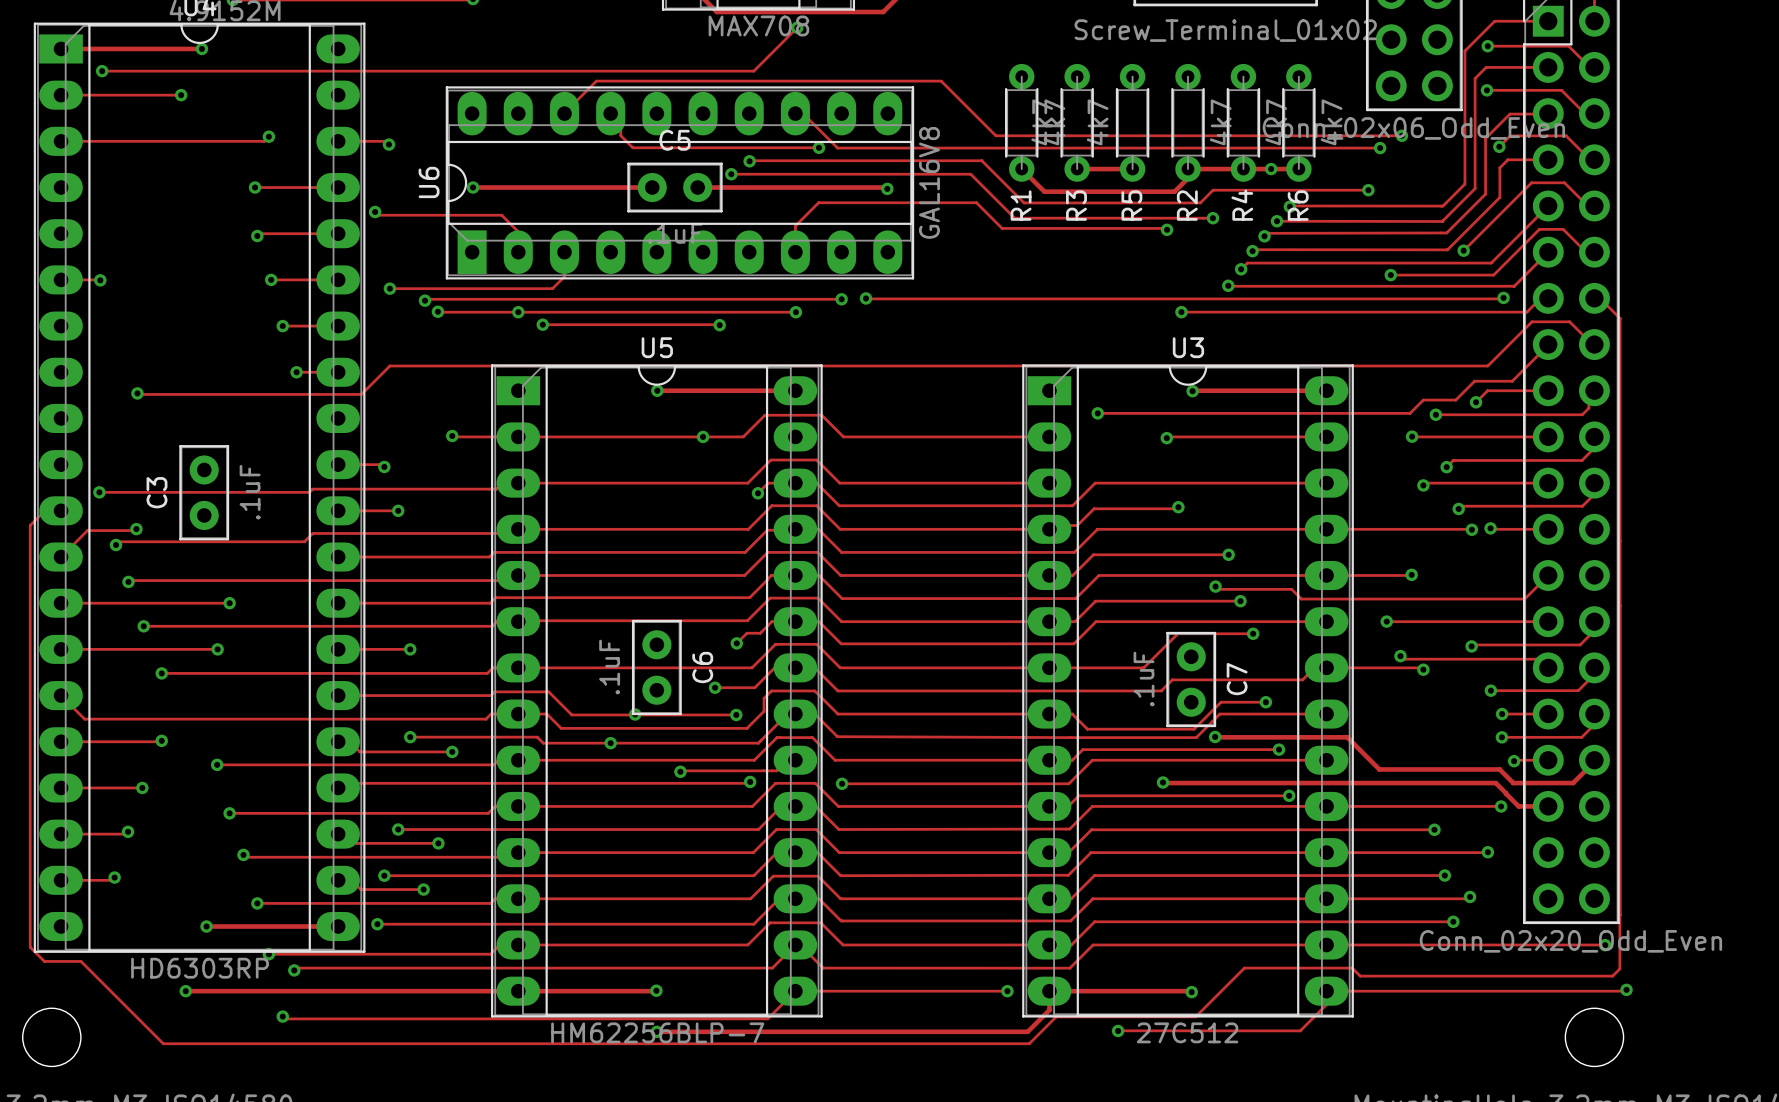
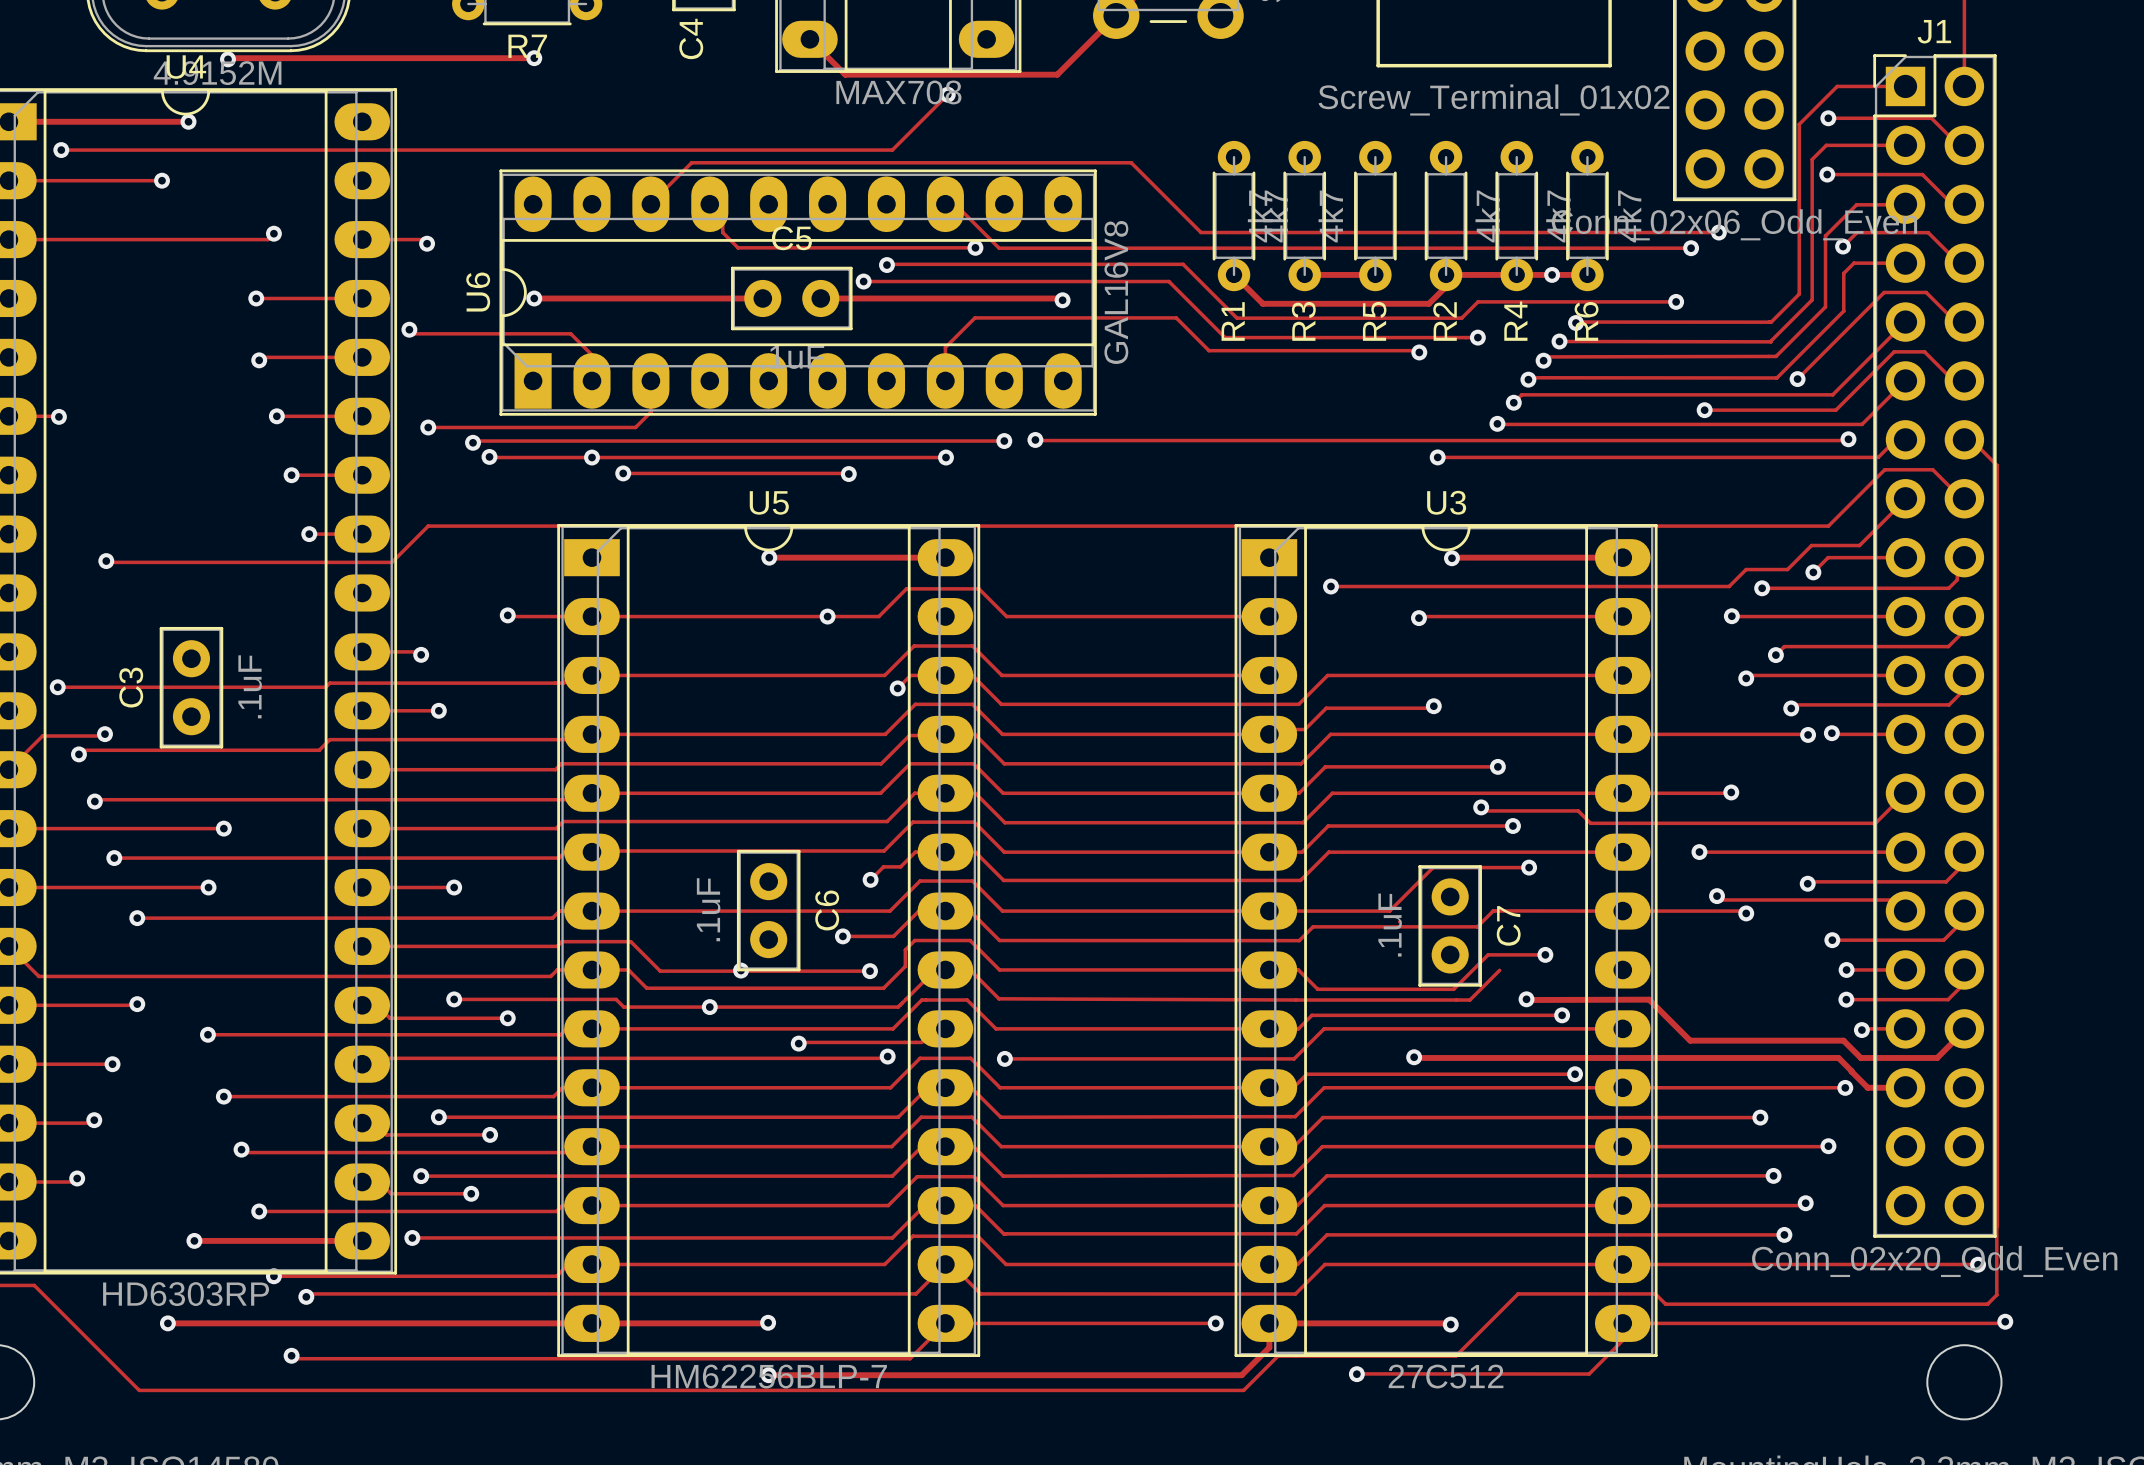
track: none -> (1494, 910) (1622, 911)
track: (1314, 667) (1302, 679) (1172, 679) (1161, 690) (837, 690) -> (1494, 910) (1477, 926) (1313, 926) (1299, 940) (999, 940)
track: (1321, 714) (1219, 714) (1196, 737) -> (1499, 970) (1469, 1000) (1456, 1000)
track: (1215, 736) (1347, 737) -> (1526, 999) (1649, 999)
via position: (1215, 736) -> (1526, 999)

